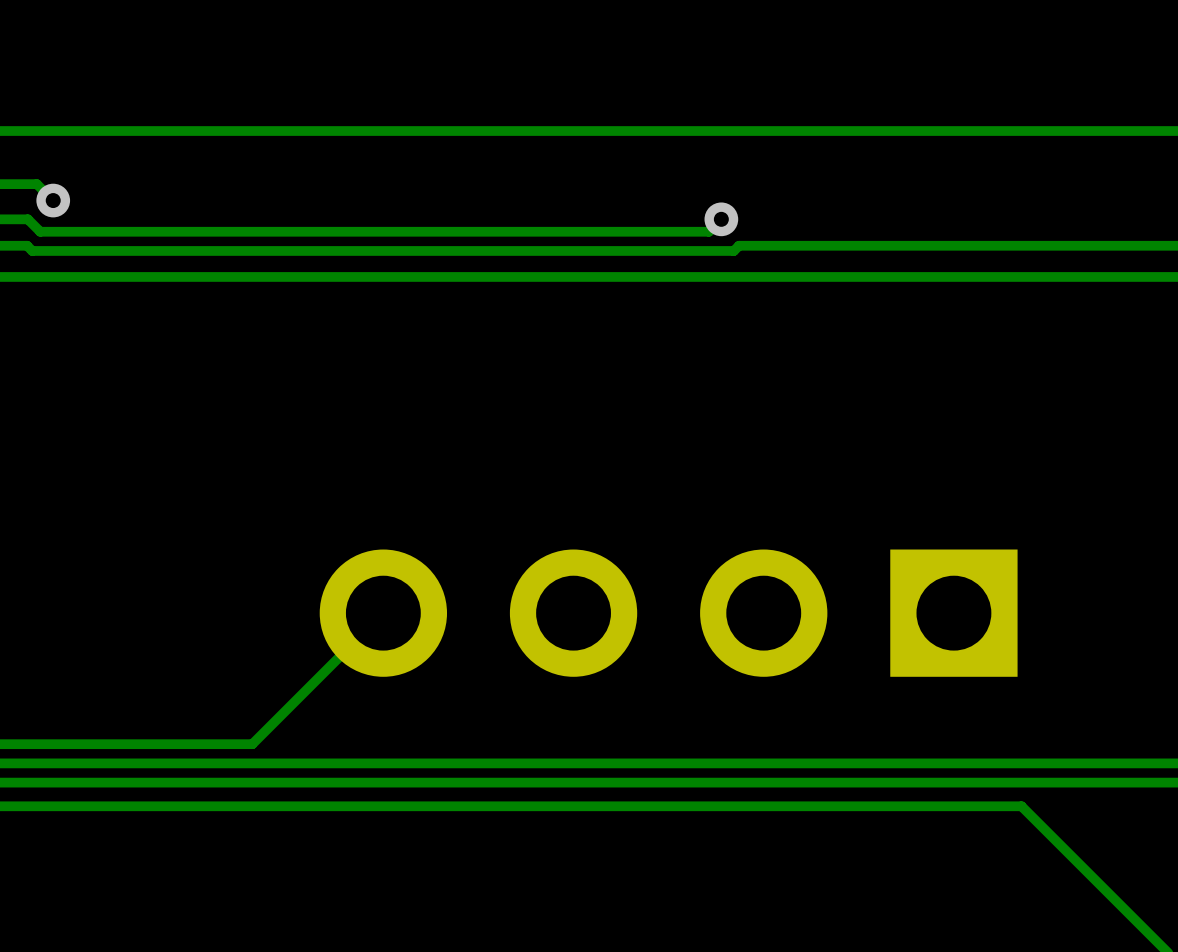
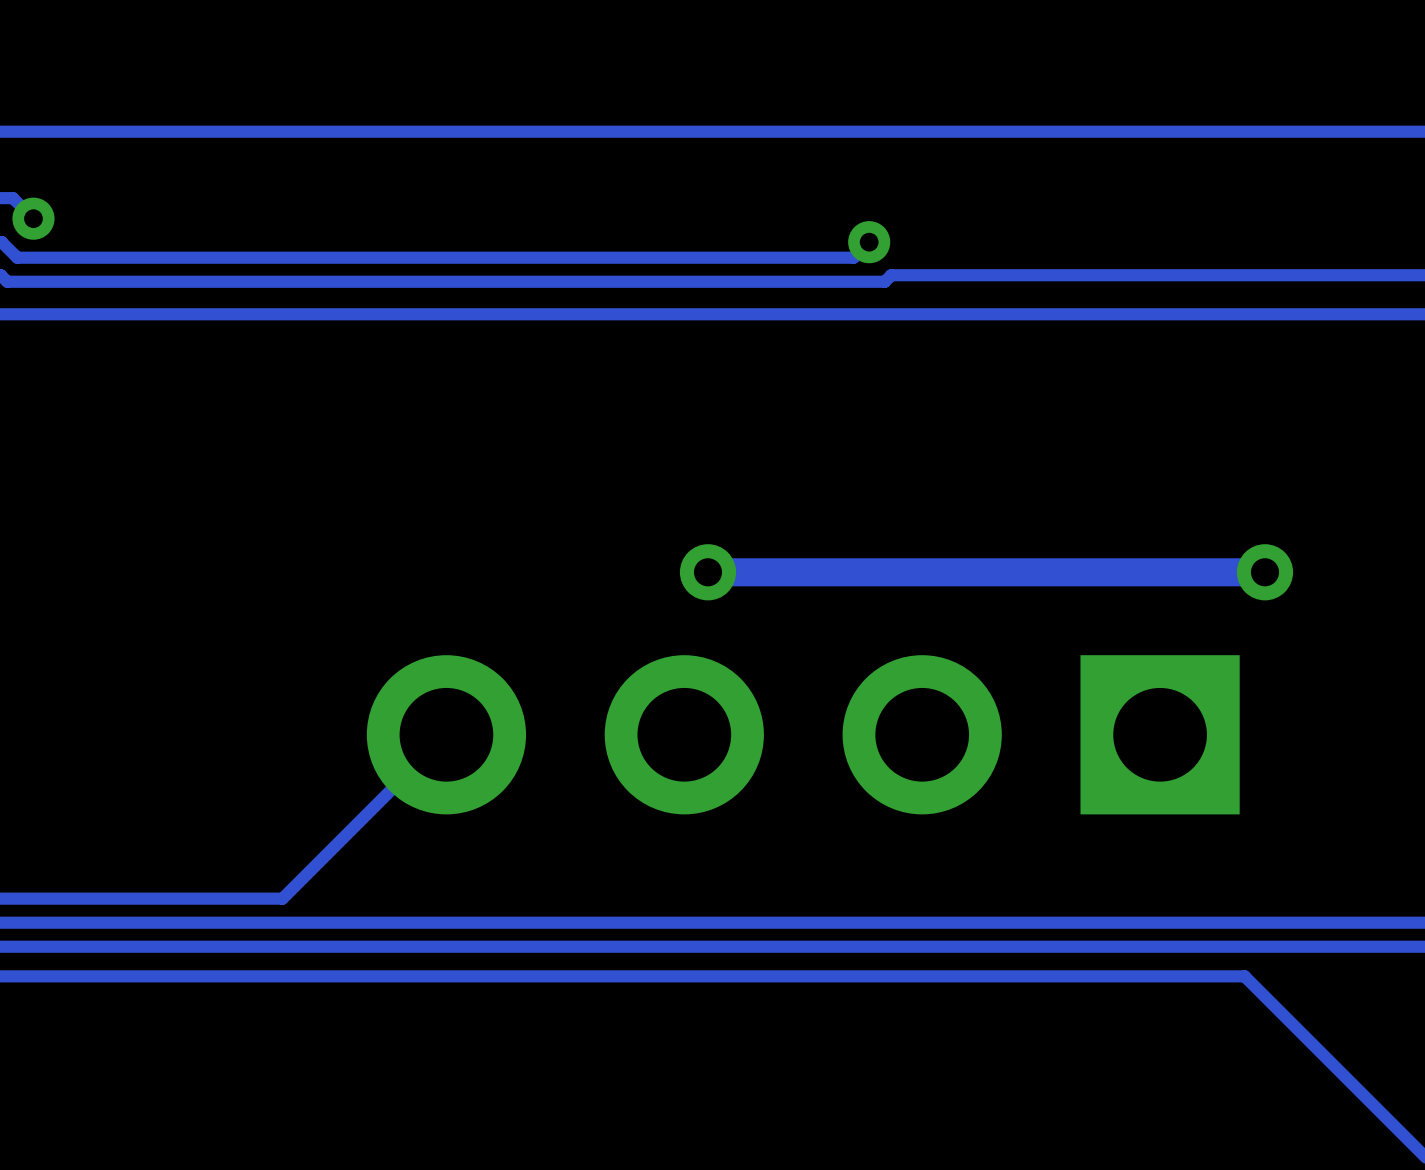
via: none -> (708, 572)
track: none -> (1264, 572) (708, 572)
via: none -> (1264, 572)

